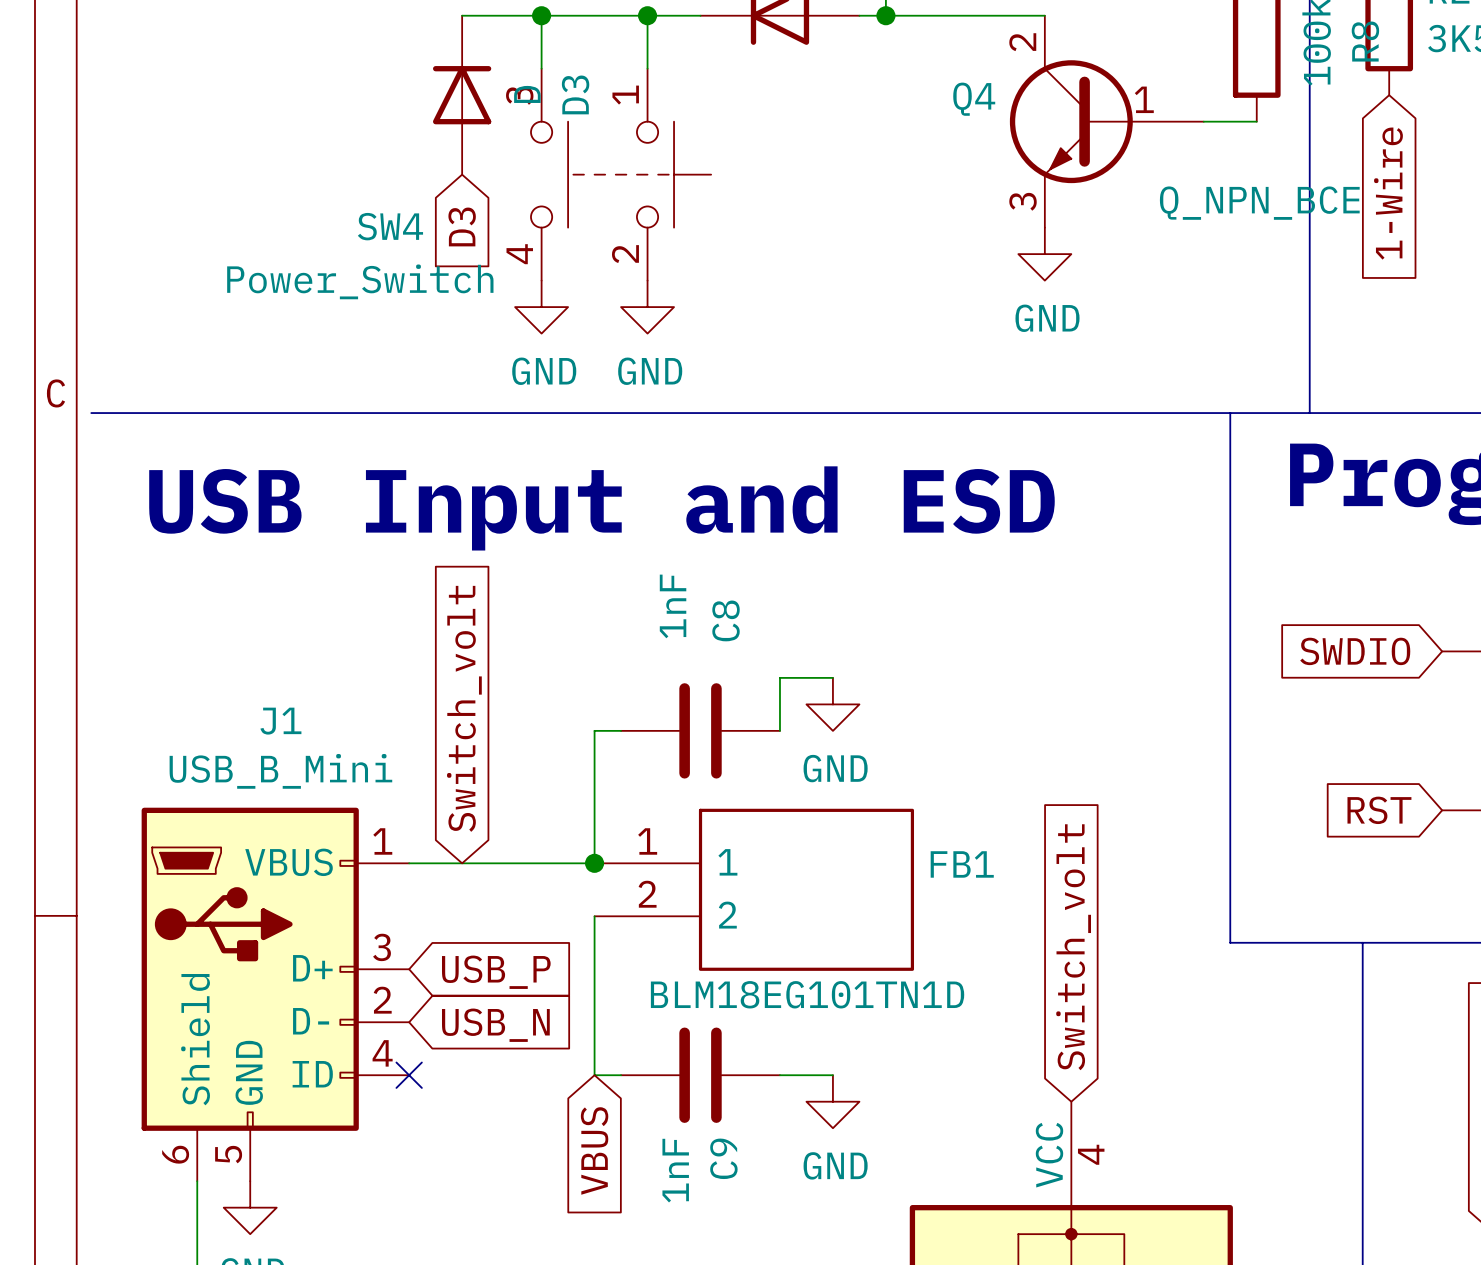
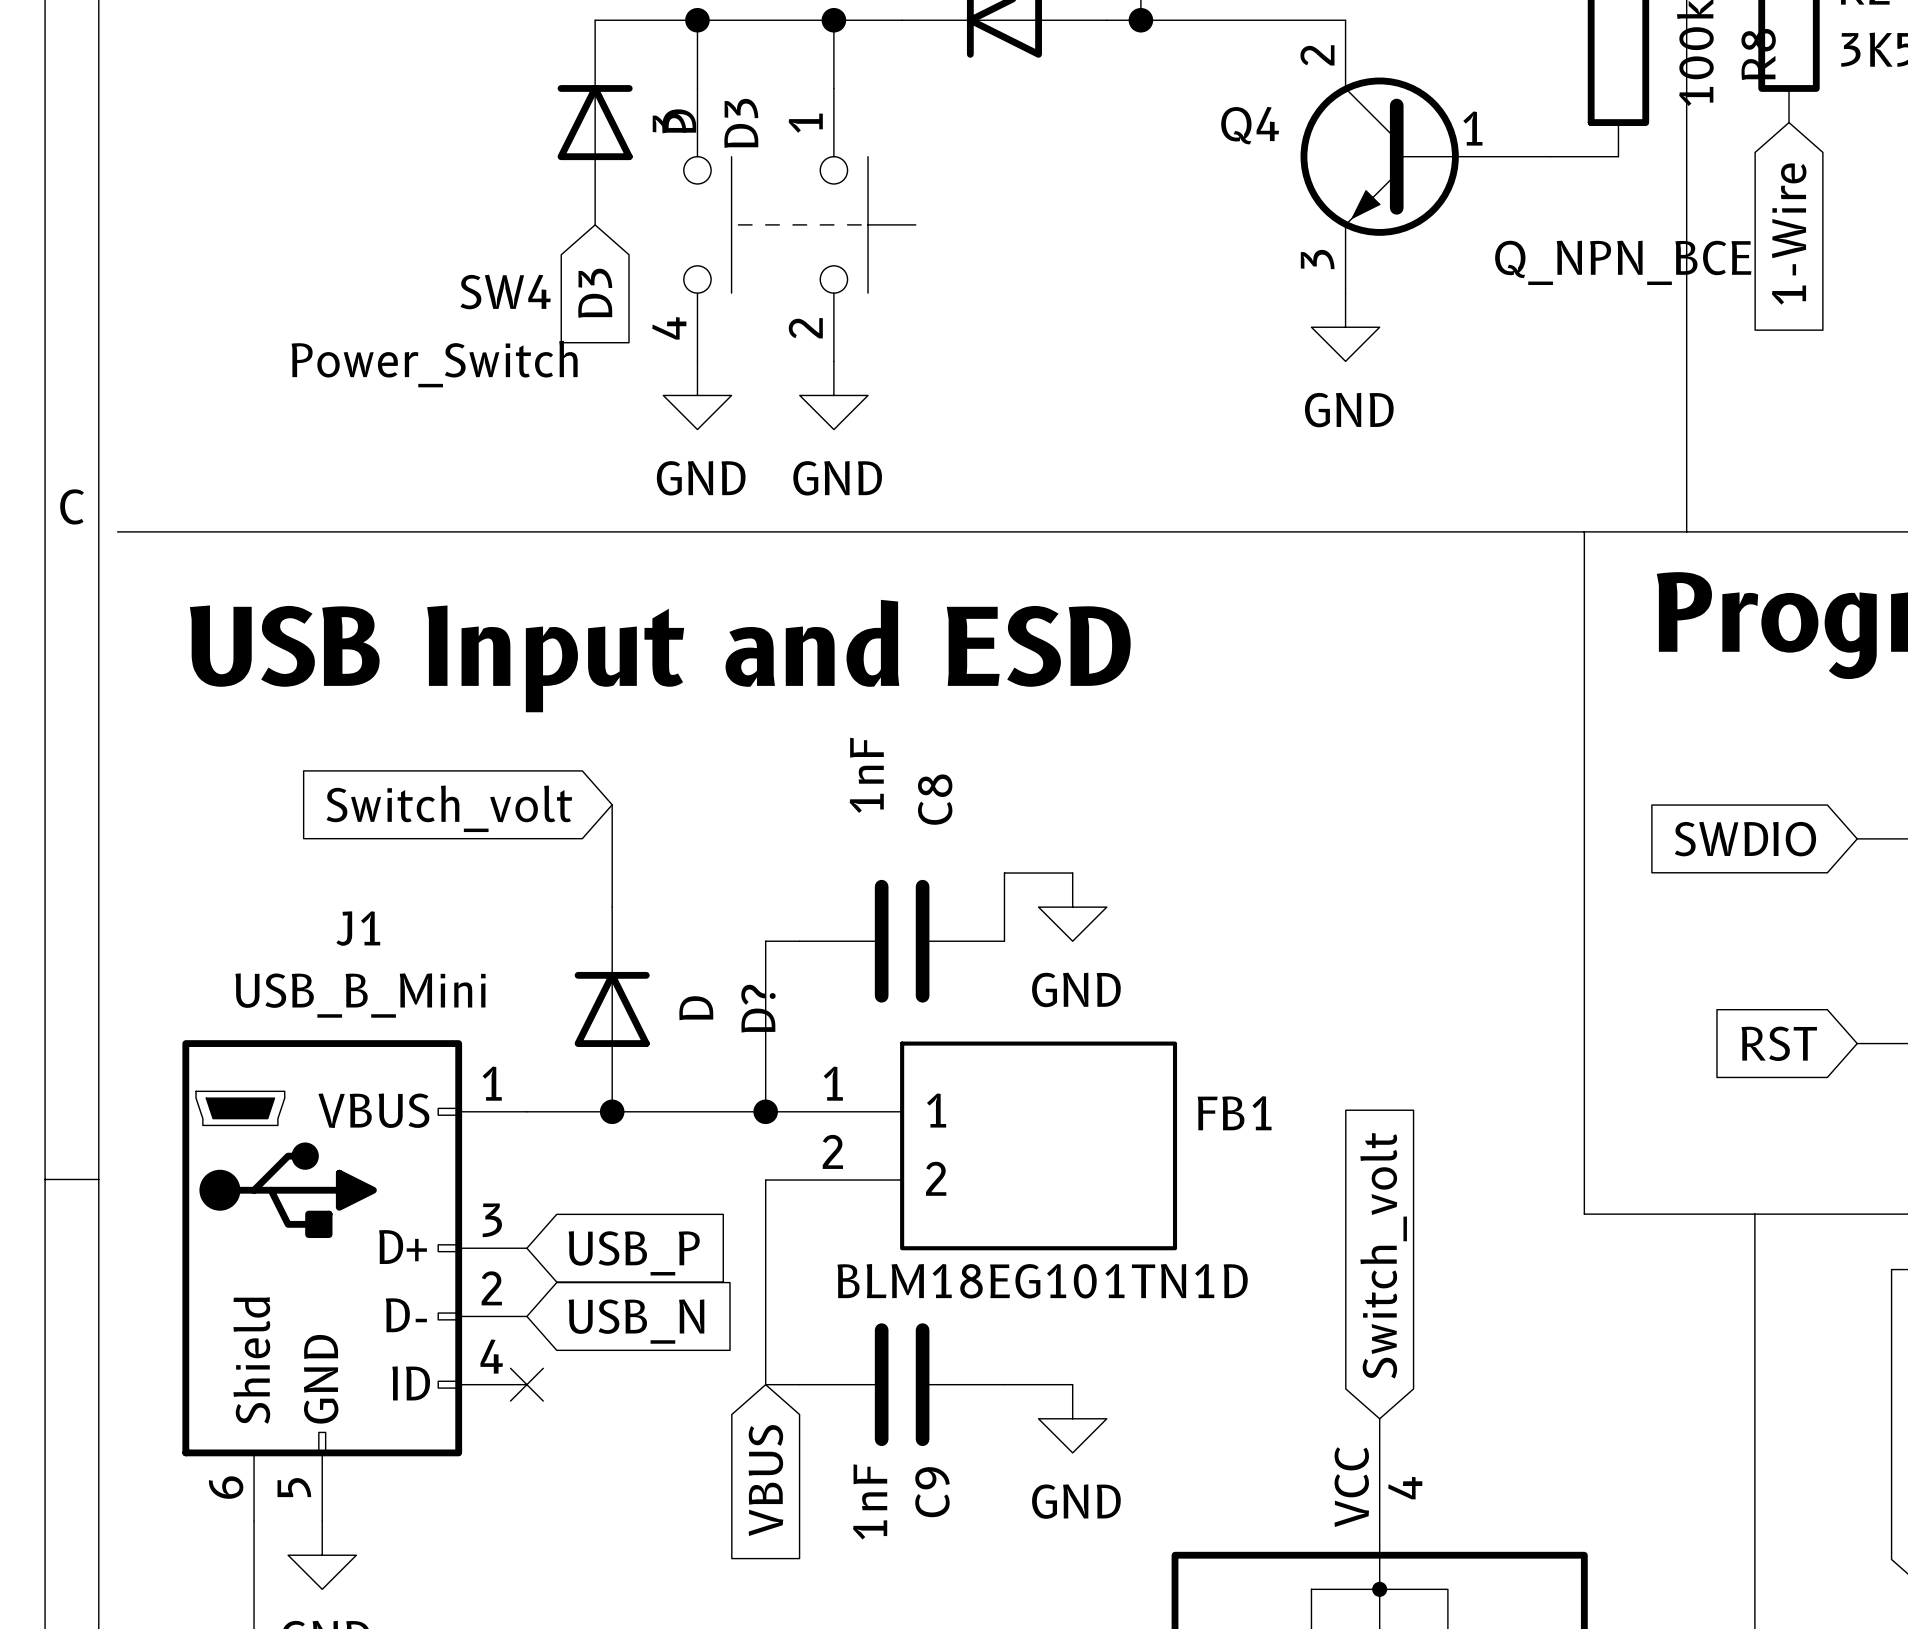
wire: none -> (612, 804) (612, 907)
global label rotation: 0° (464, 708) -> 90° counterclockwise (449, 808)
D?: none -> D (612, 1009)
junction: none -> (612, 1111)

